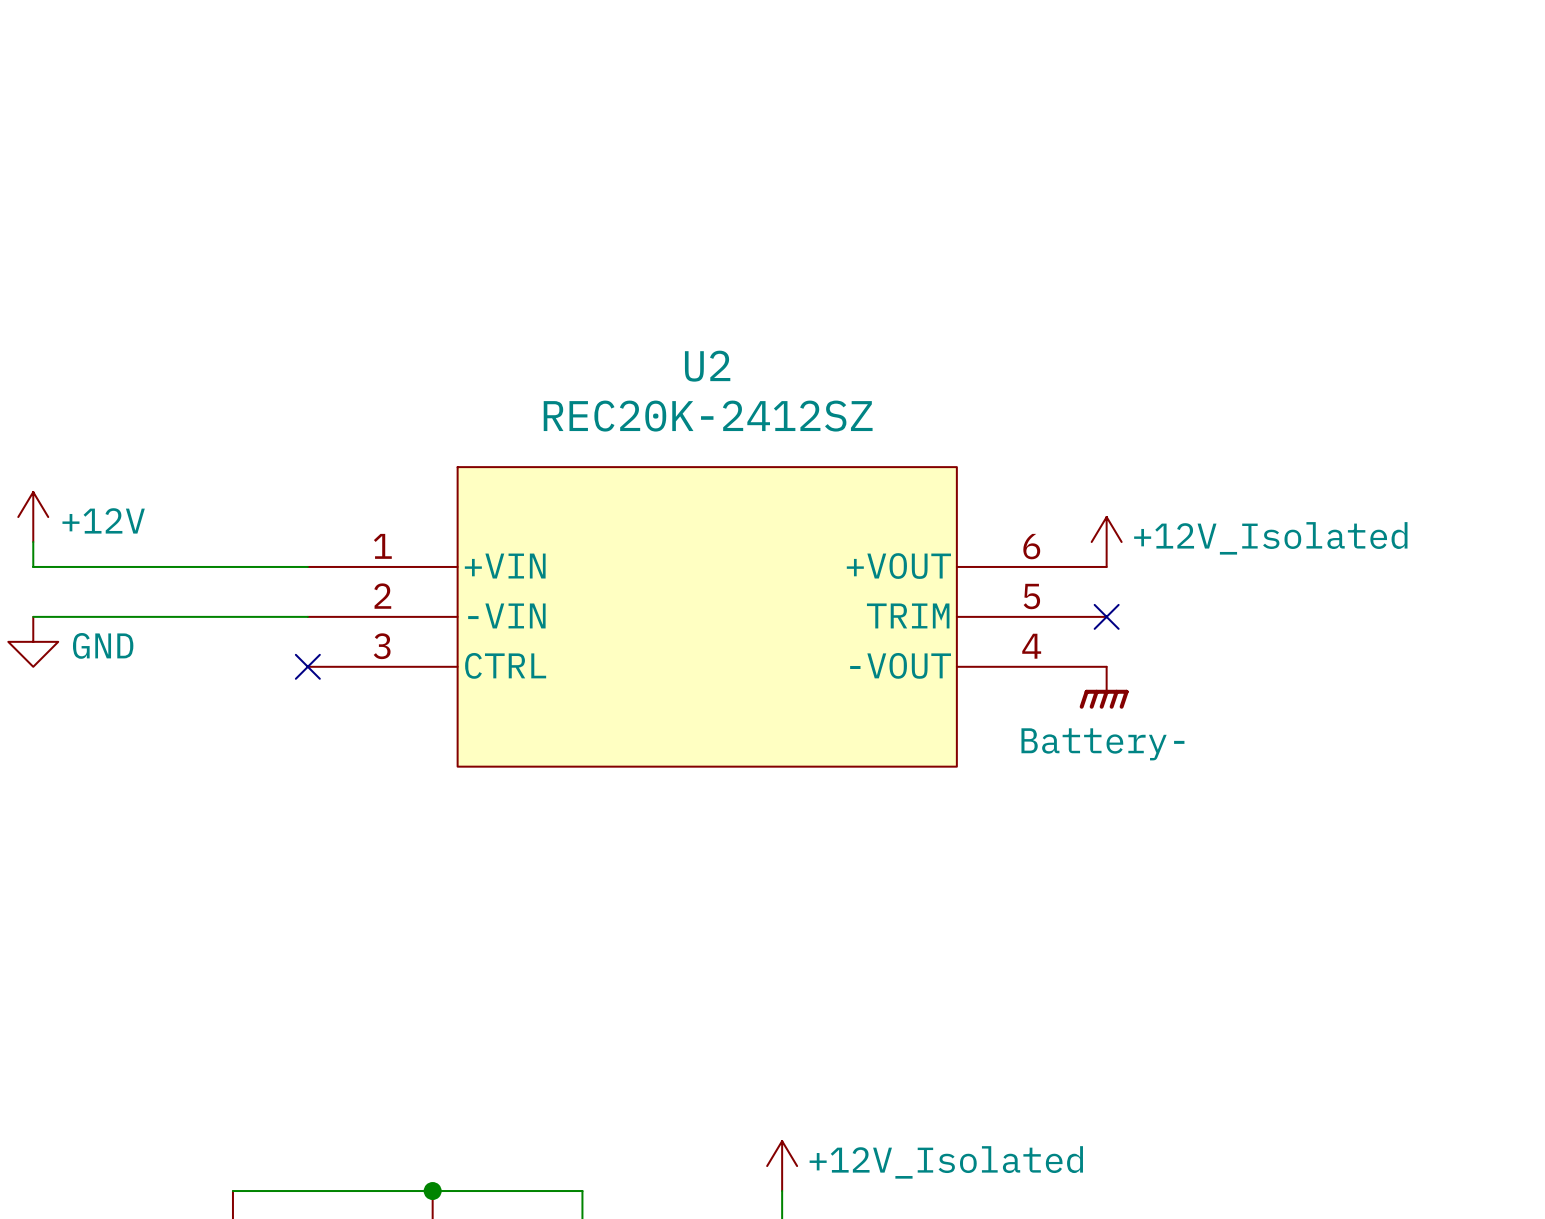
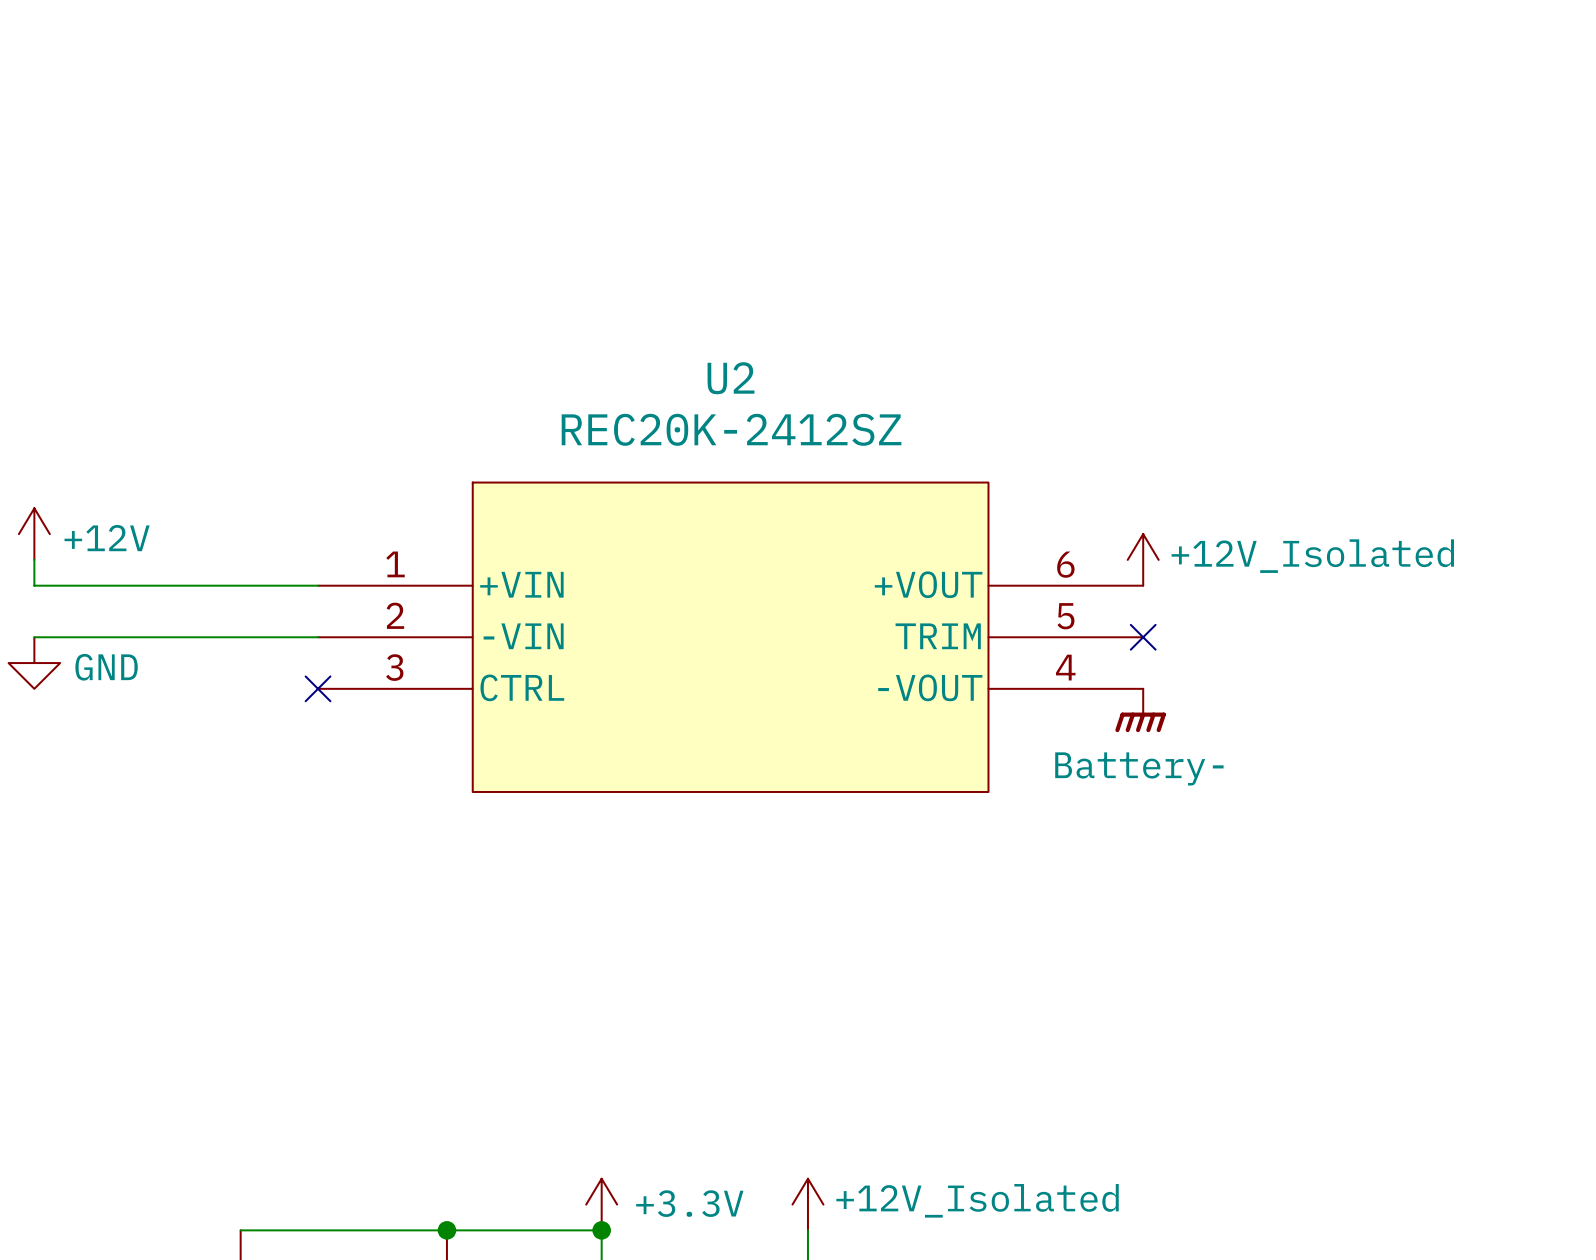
power symbol: none -> +3.3V (601, 1204)
junction: none -> (601, 1230)

